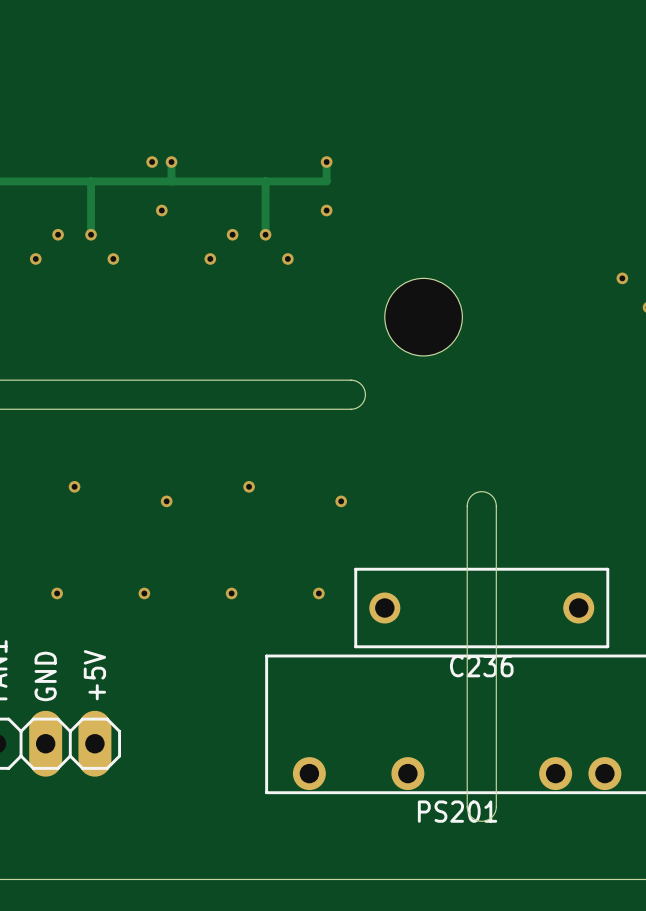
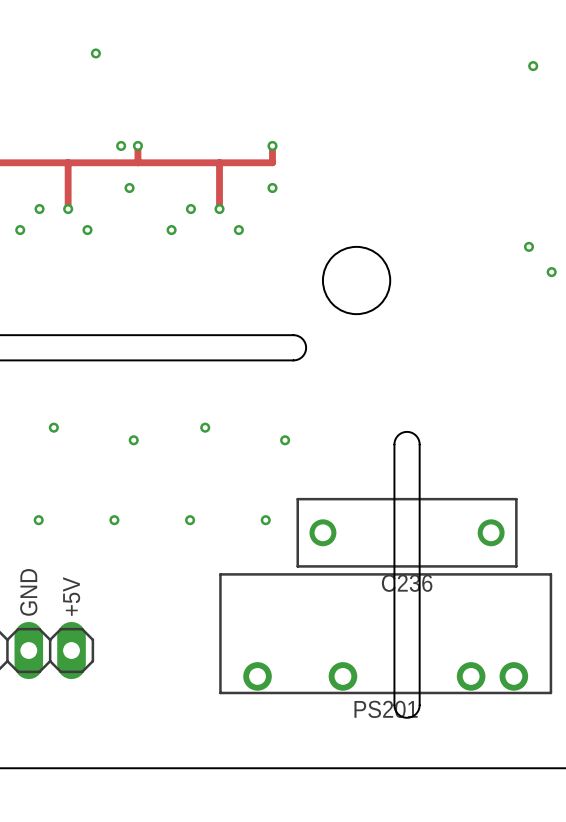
via: none -> (95, 53)
via: none -> (533, 66)

